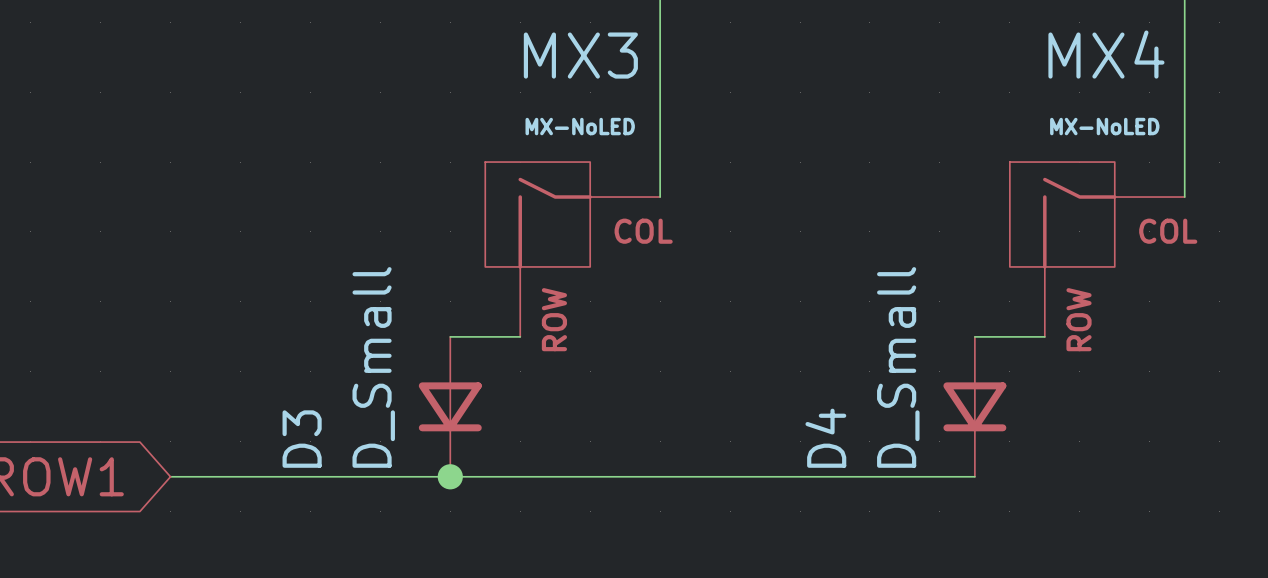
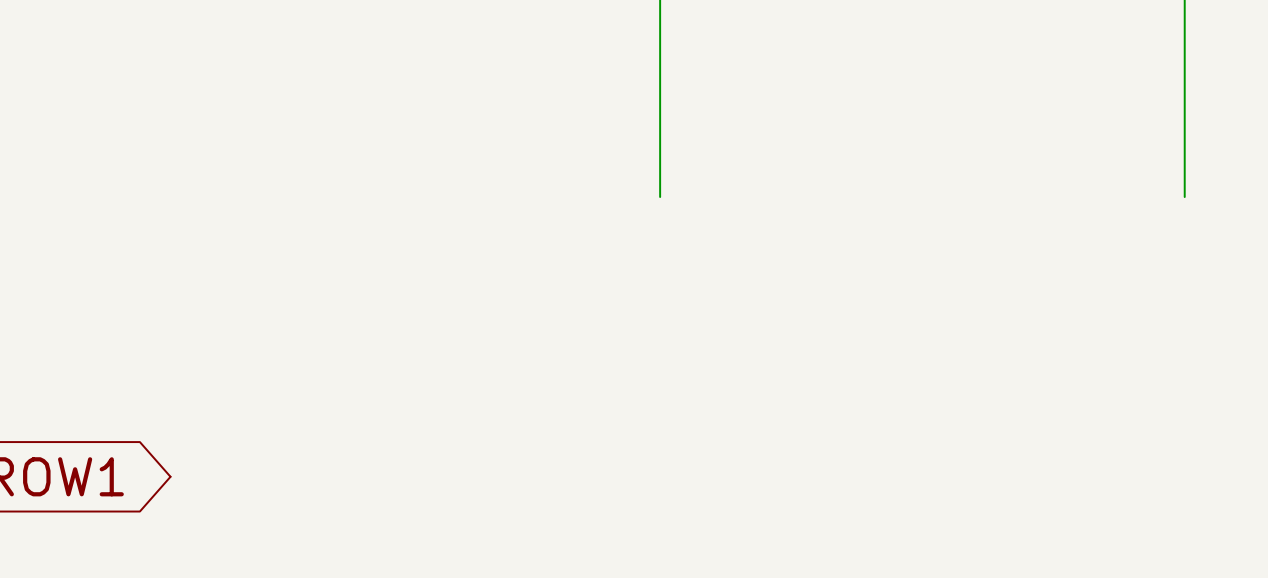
MX3: MX-NoLED (572, 249) -> none
MX4: MX-NoLED (1097, 249) -> none
wire: (450, 336) (520, 336) -> none
wire: (974, 336) (1044, 336) -> none
D3: D_Small (450, 406) -> none
D4: D_Small (974, 406) -> none
wire: (170, 476) (974, 476) -> none
junction: (450, 476) -> none

